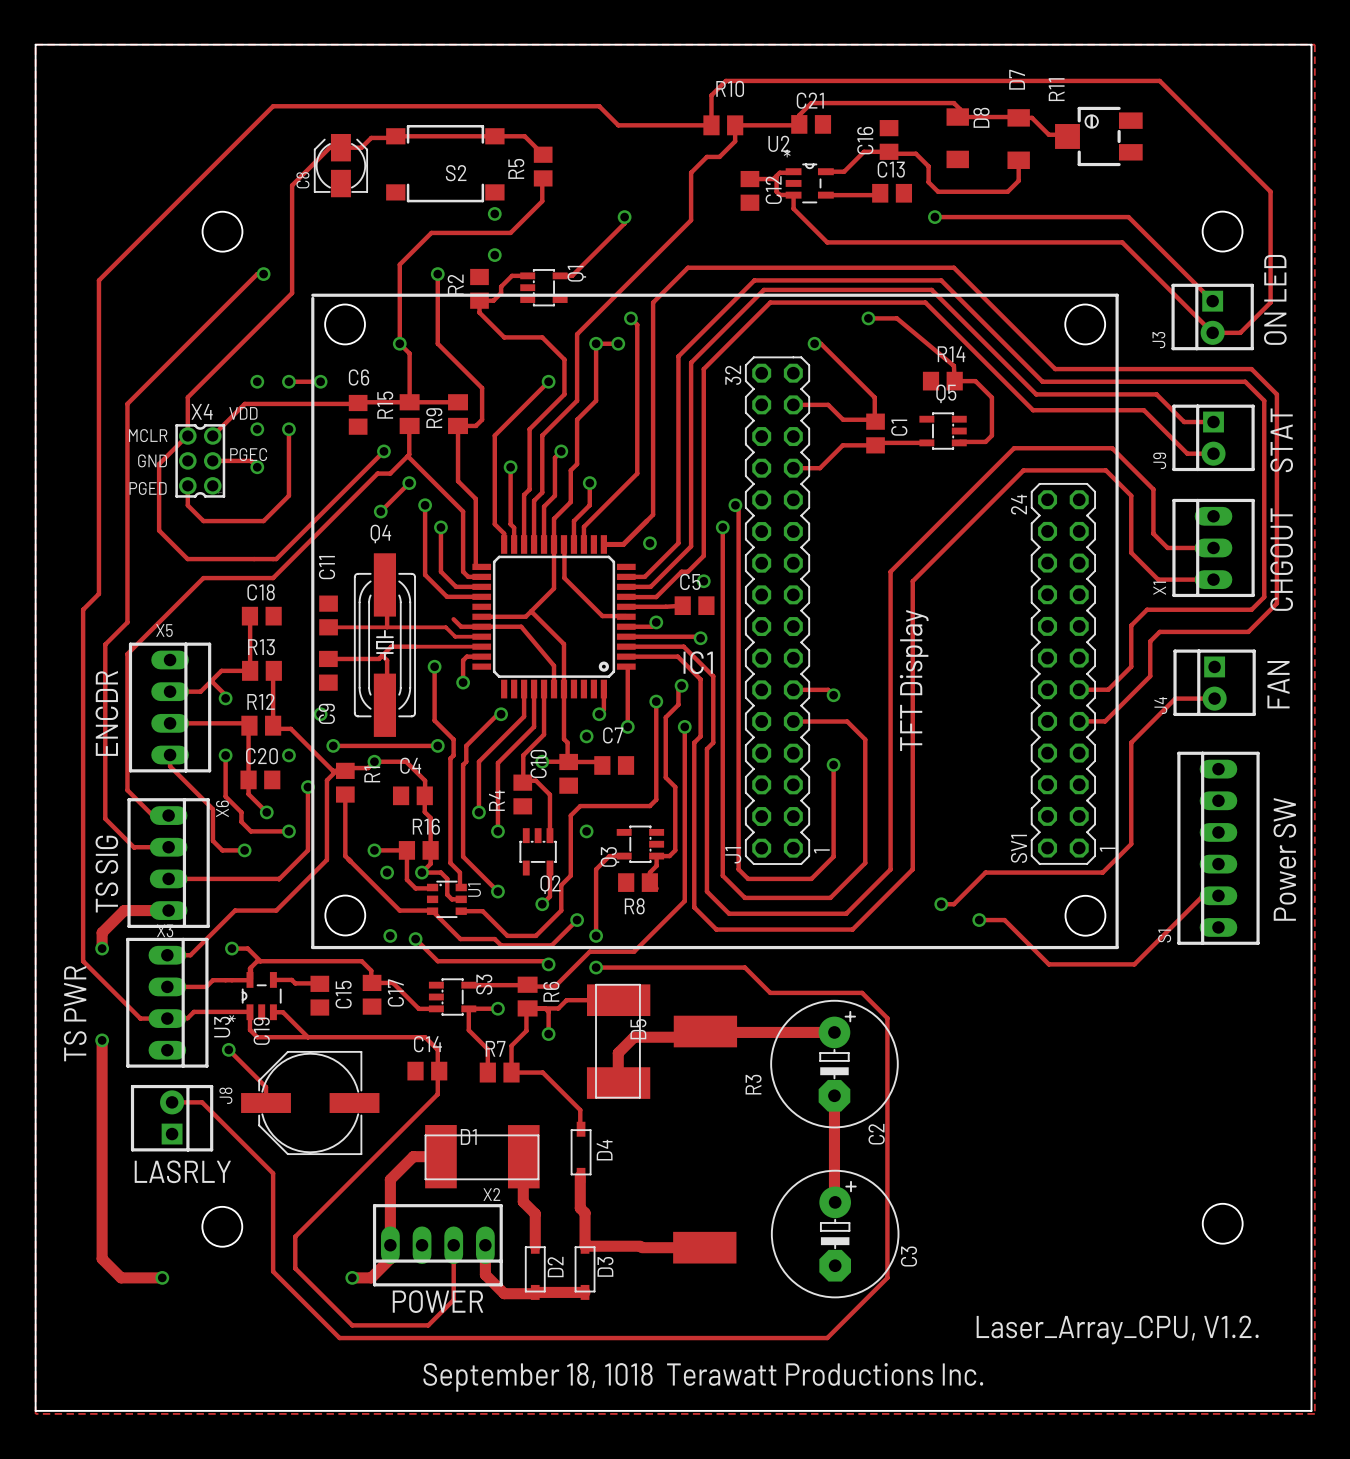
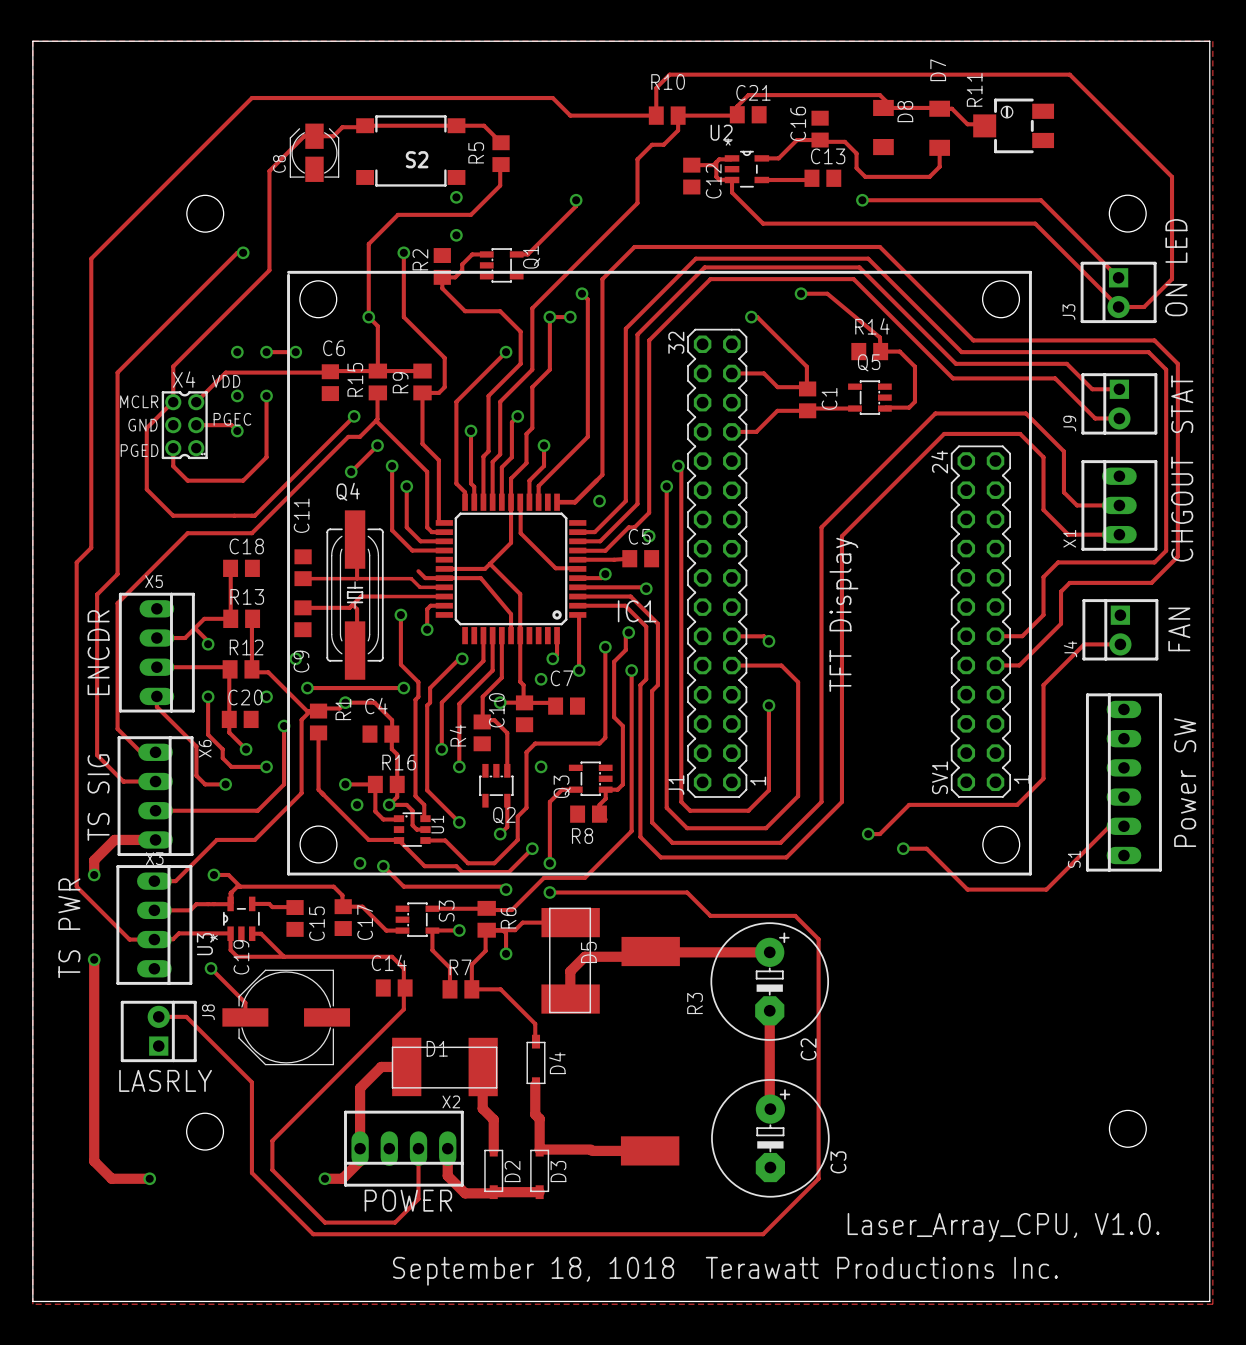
text: Laser_Array_CPU, V1.2. (1117, 1330) -> Laser_Array_CPU, V1.0. (1003, 1227)

